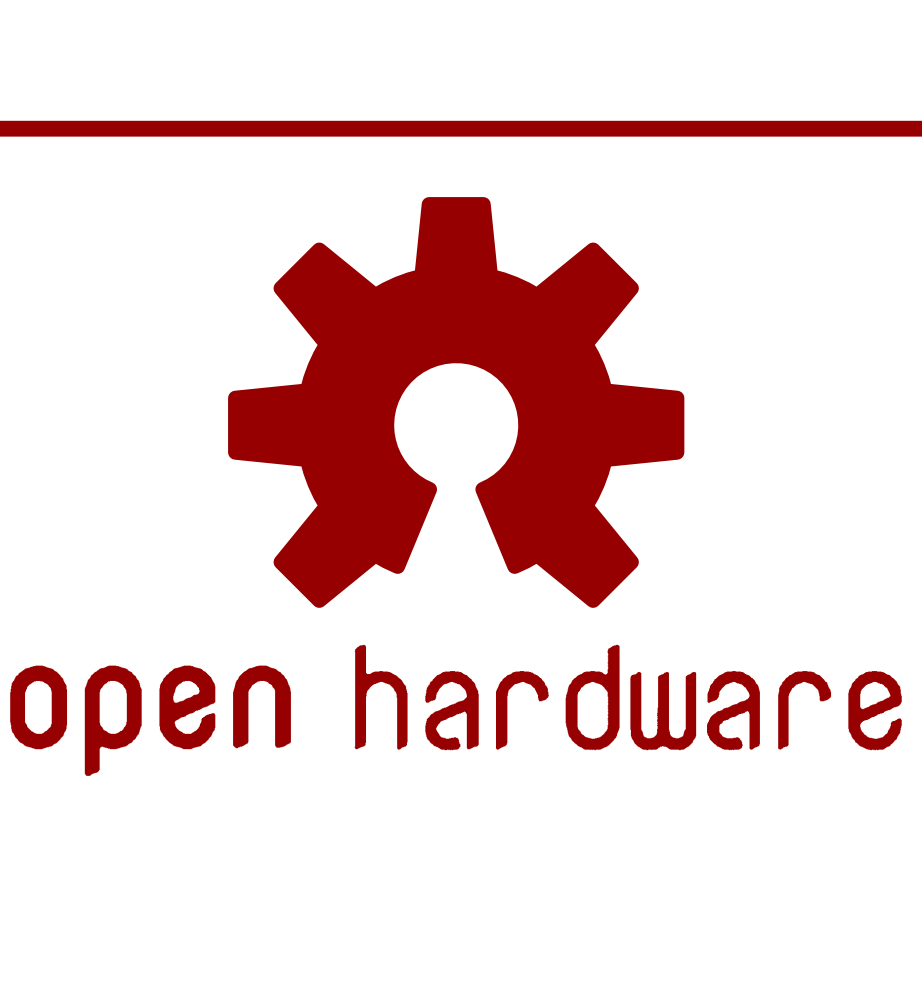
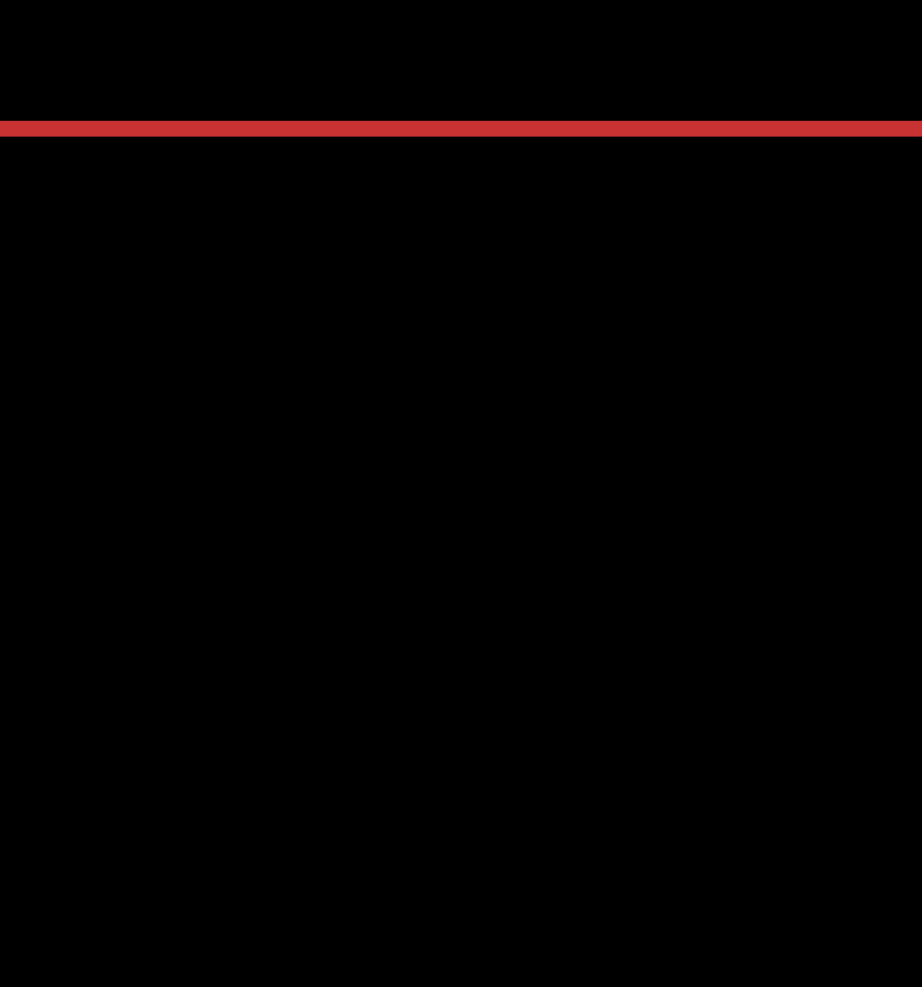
part: (455, 486) -> none

